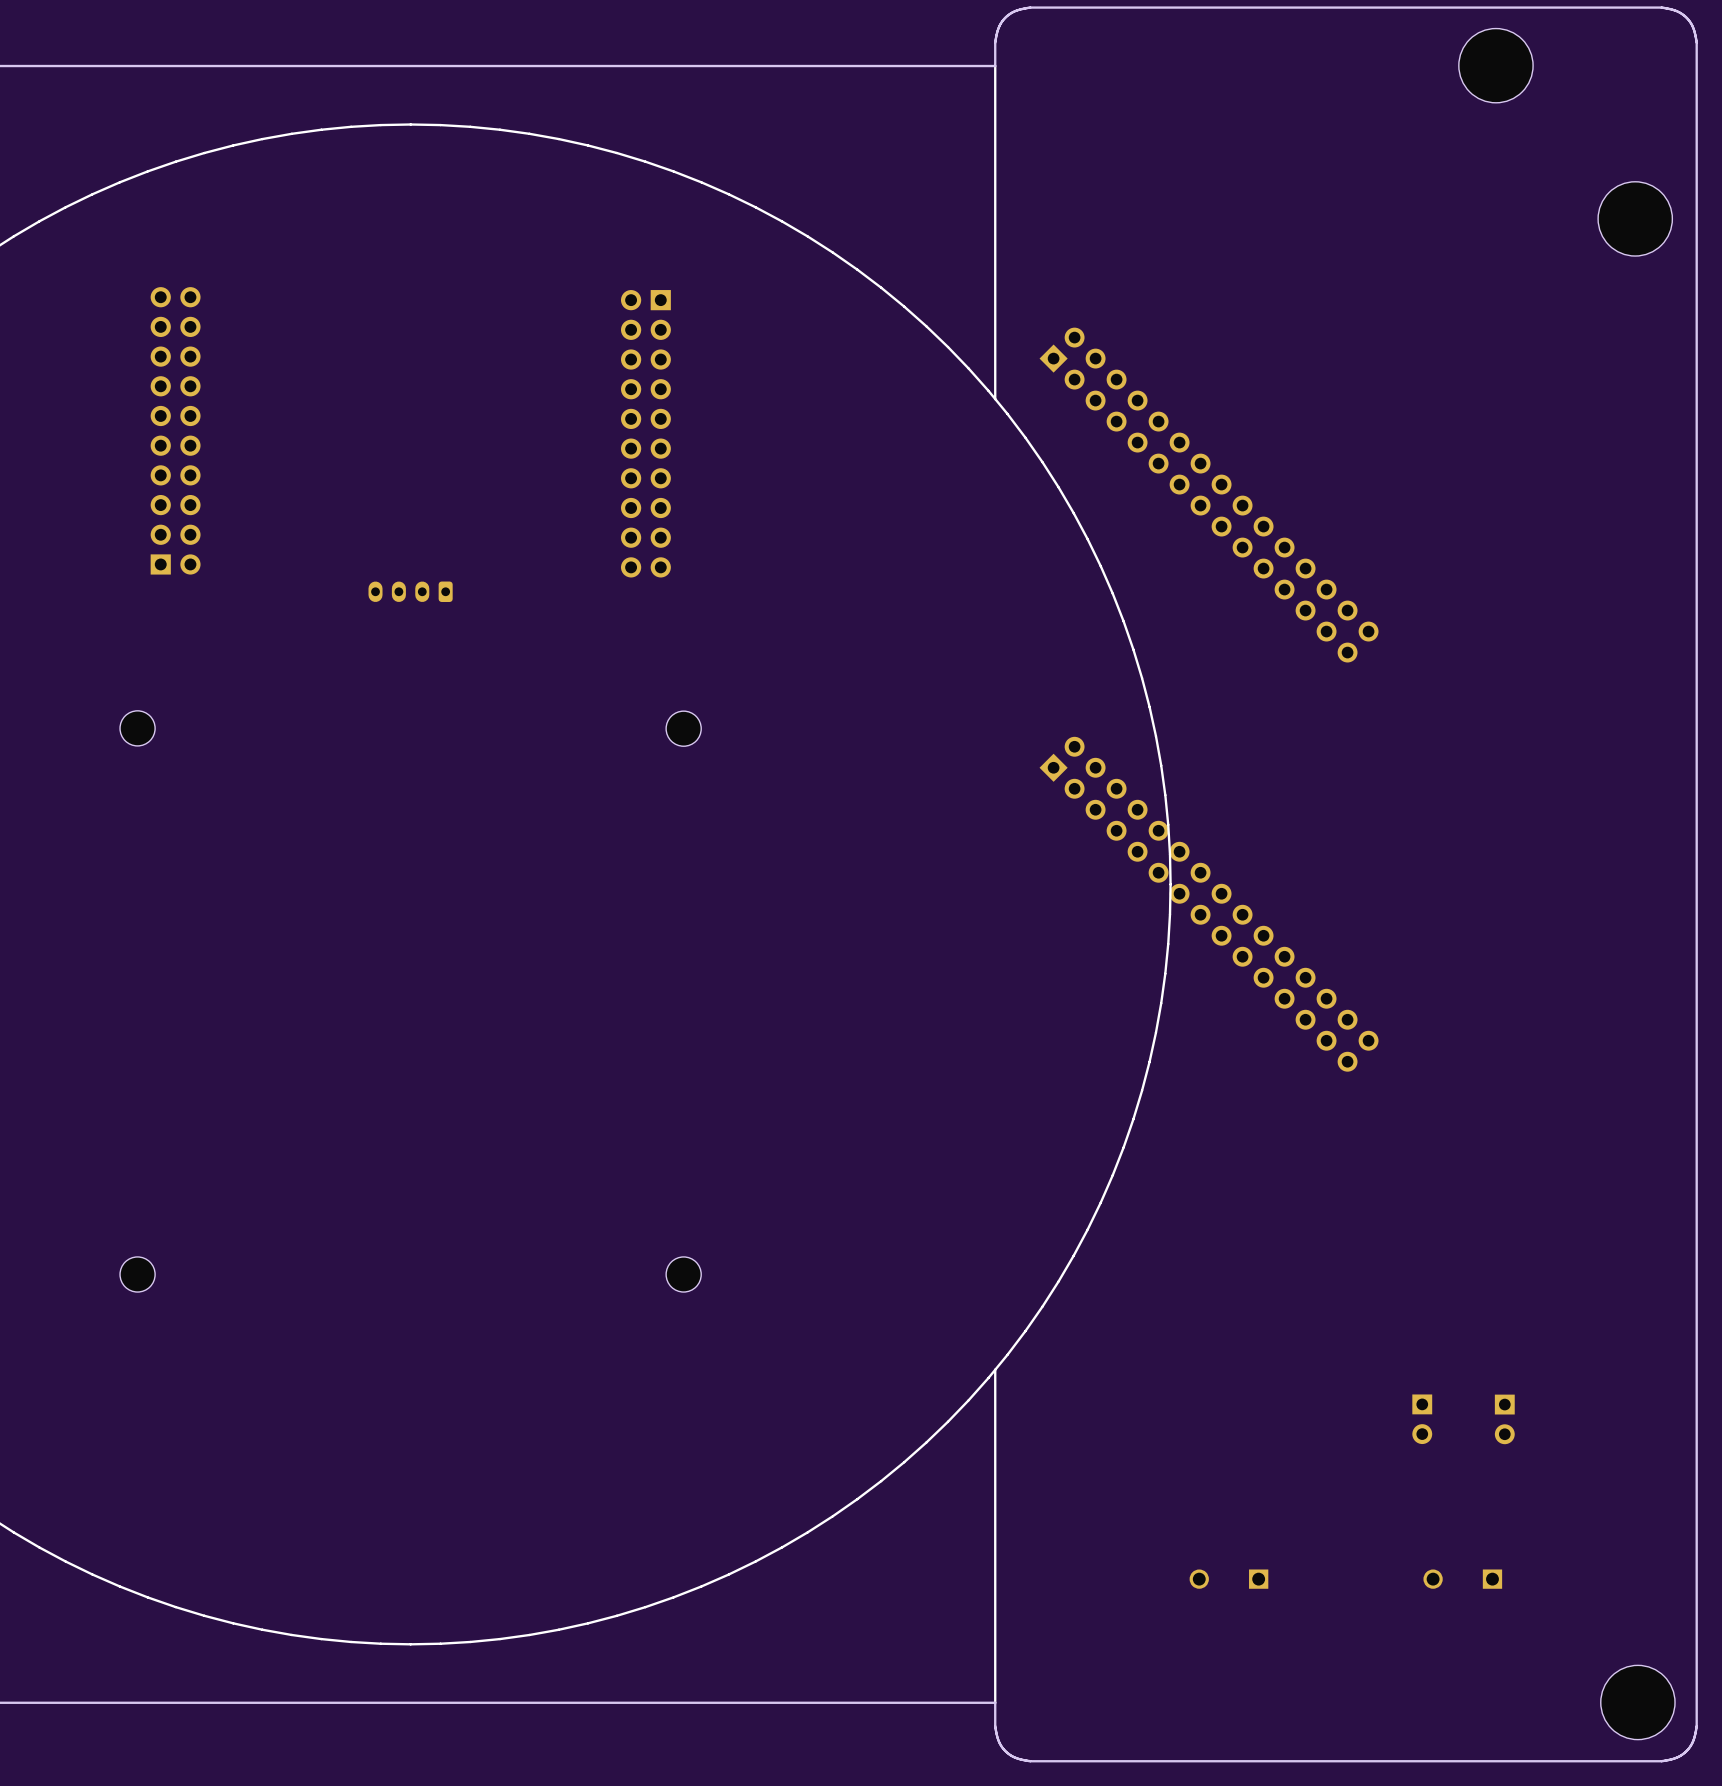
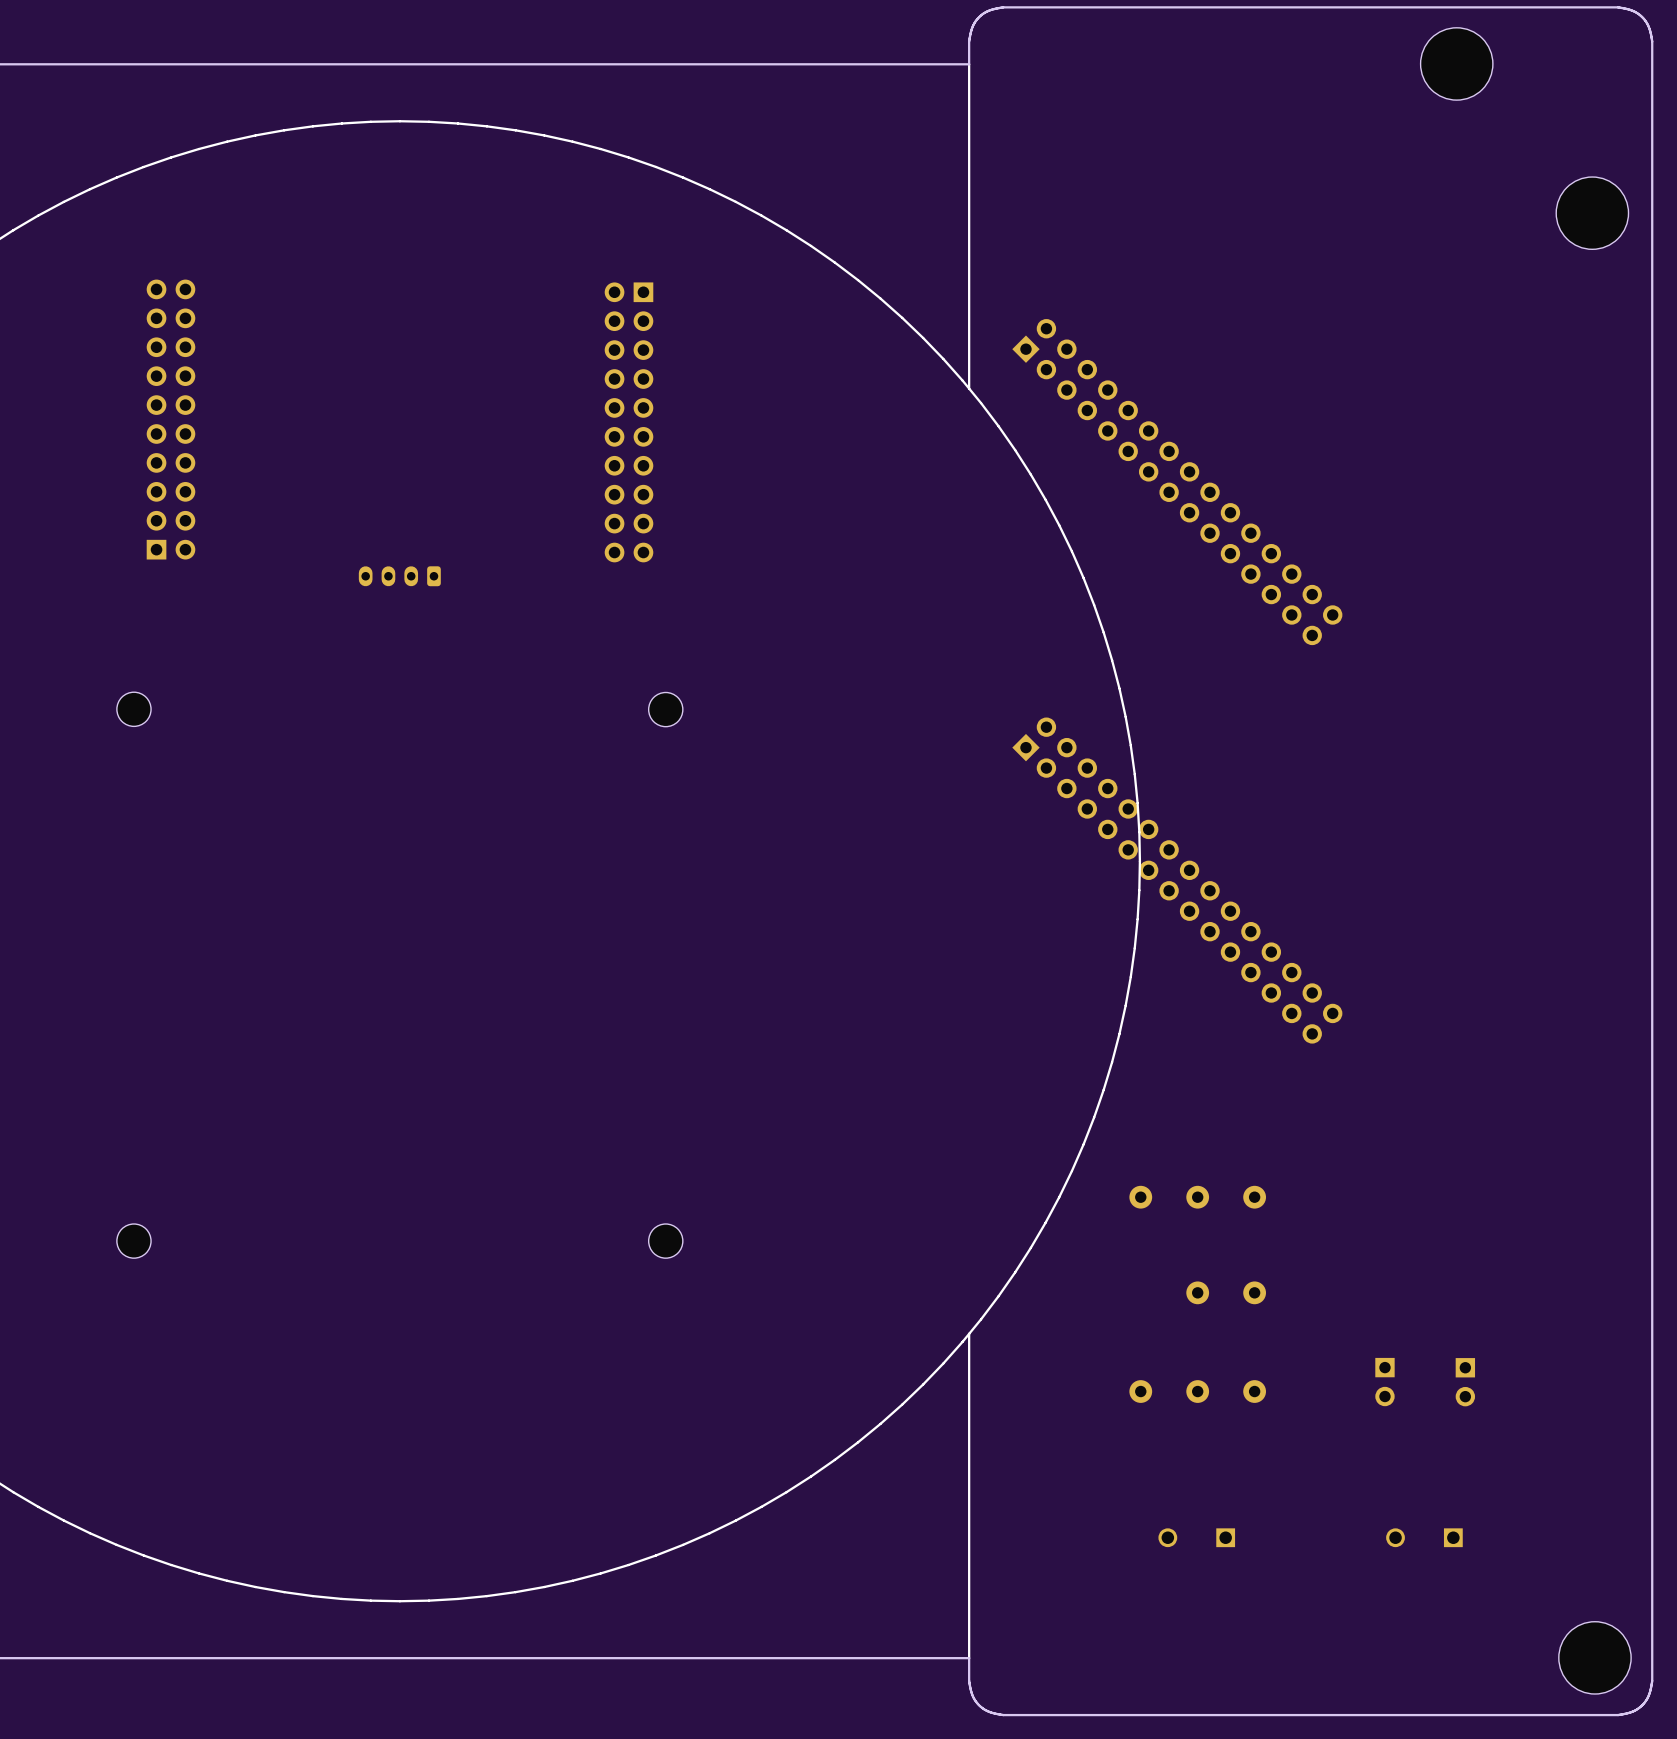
part: none -> (1140, 1197)
part: none -> (1197, 1197)
part: none -> (1254, 1197)
part: none -> (1197, 1292)
part: none -> (1254, 1292)
part: none -> (1140, 1391)
part: none -> (1197, 1391)
part: none -> (1254, 1391)

